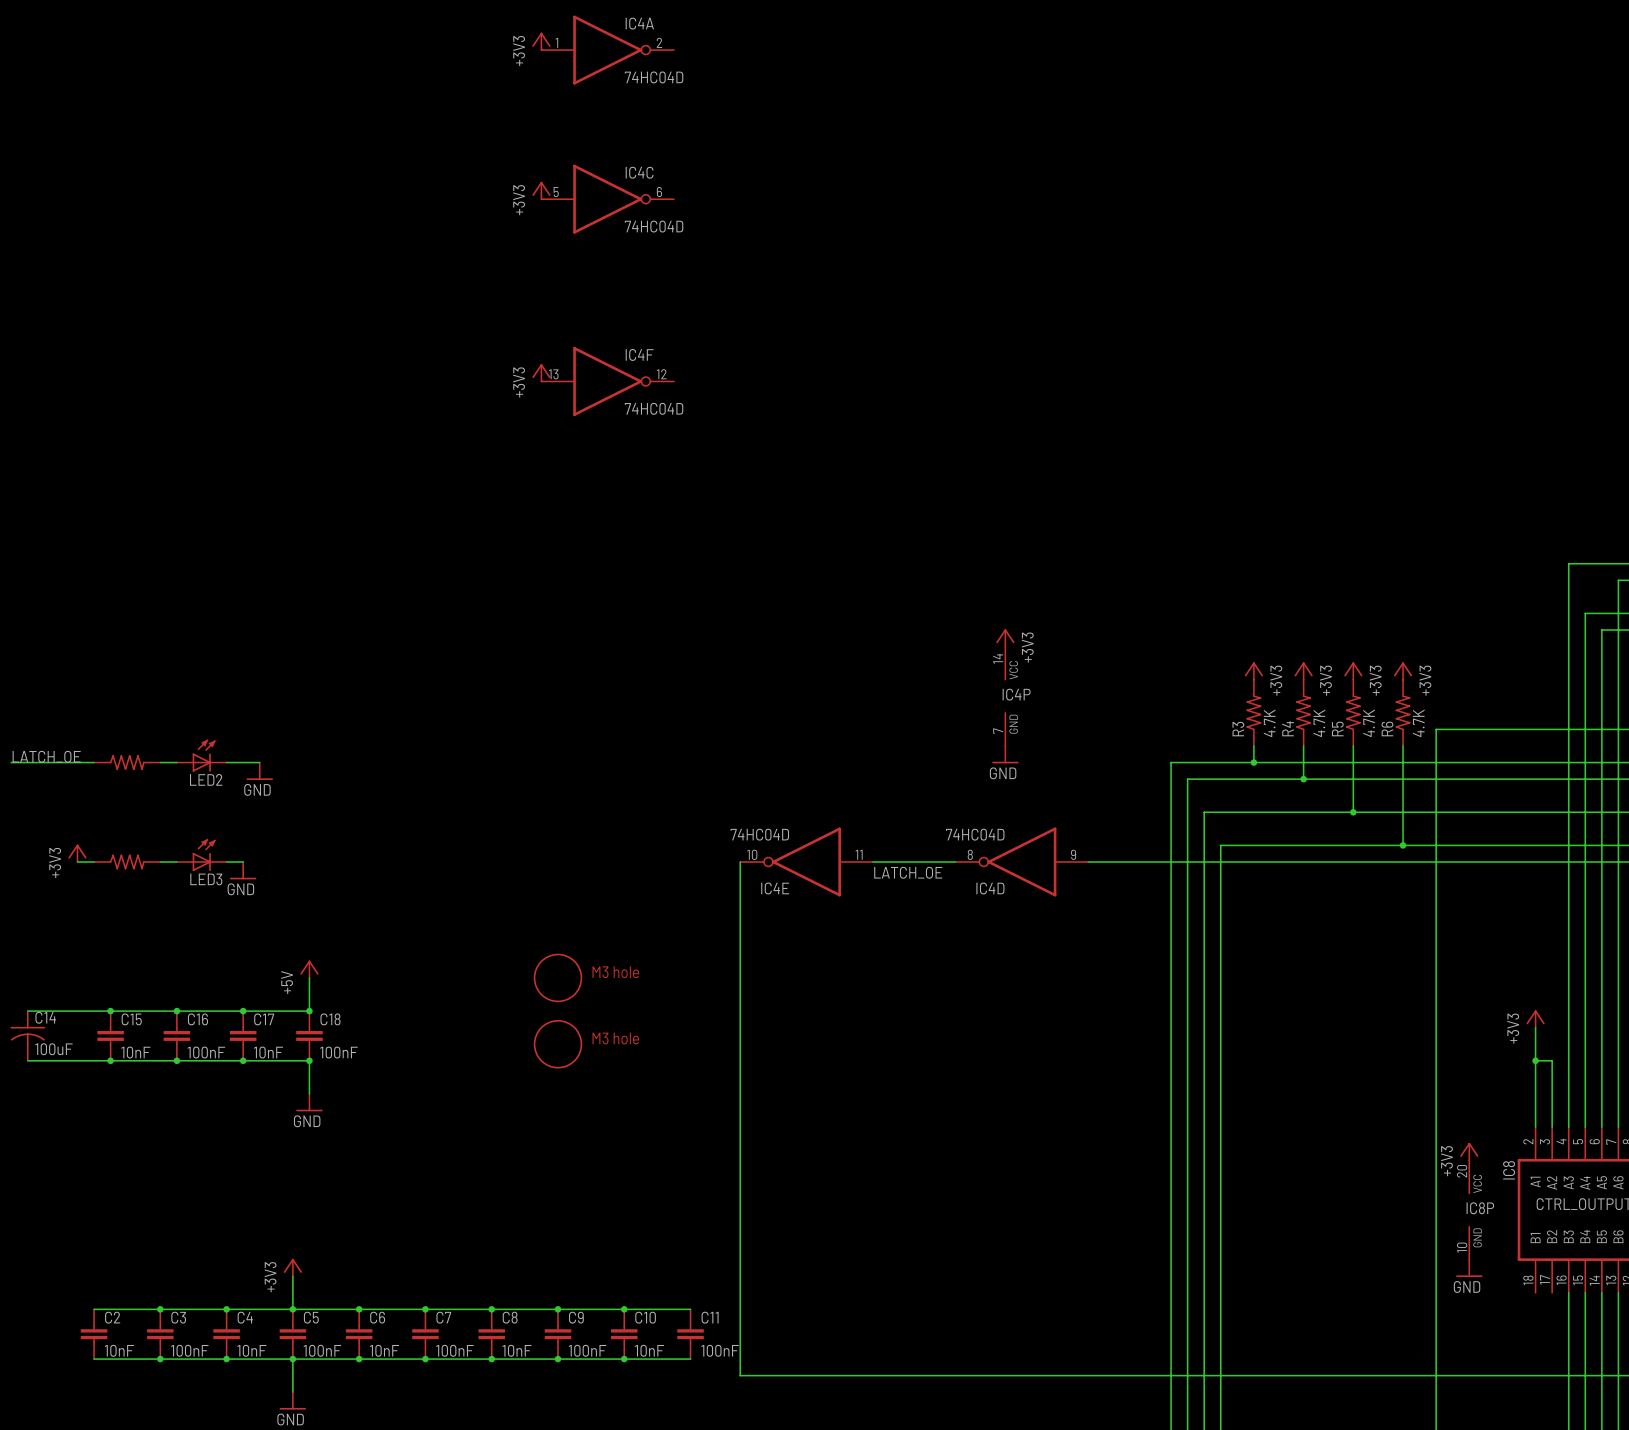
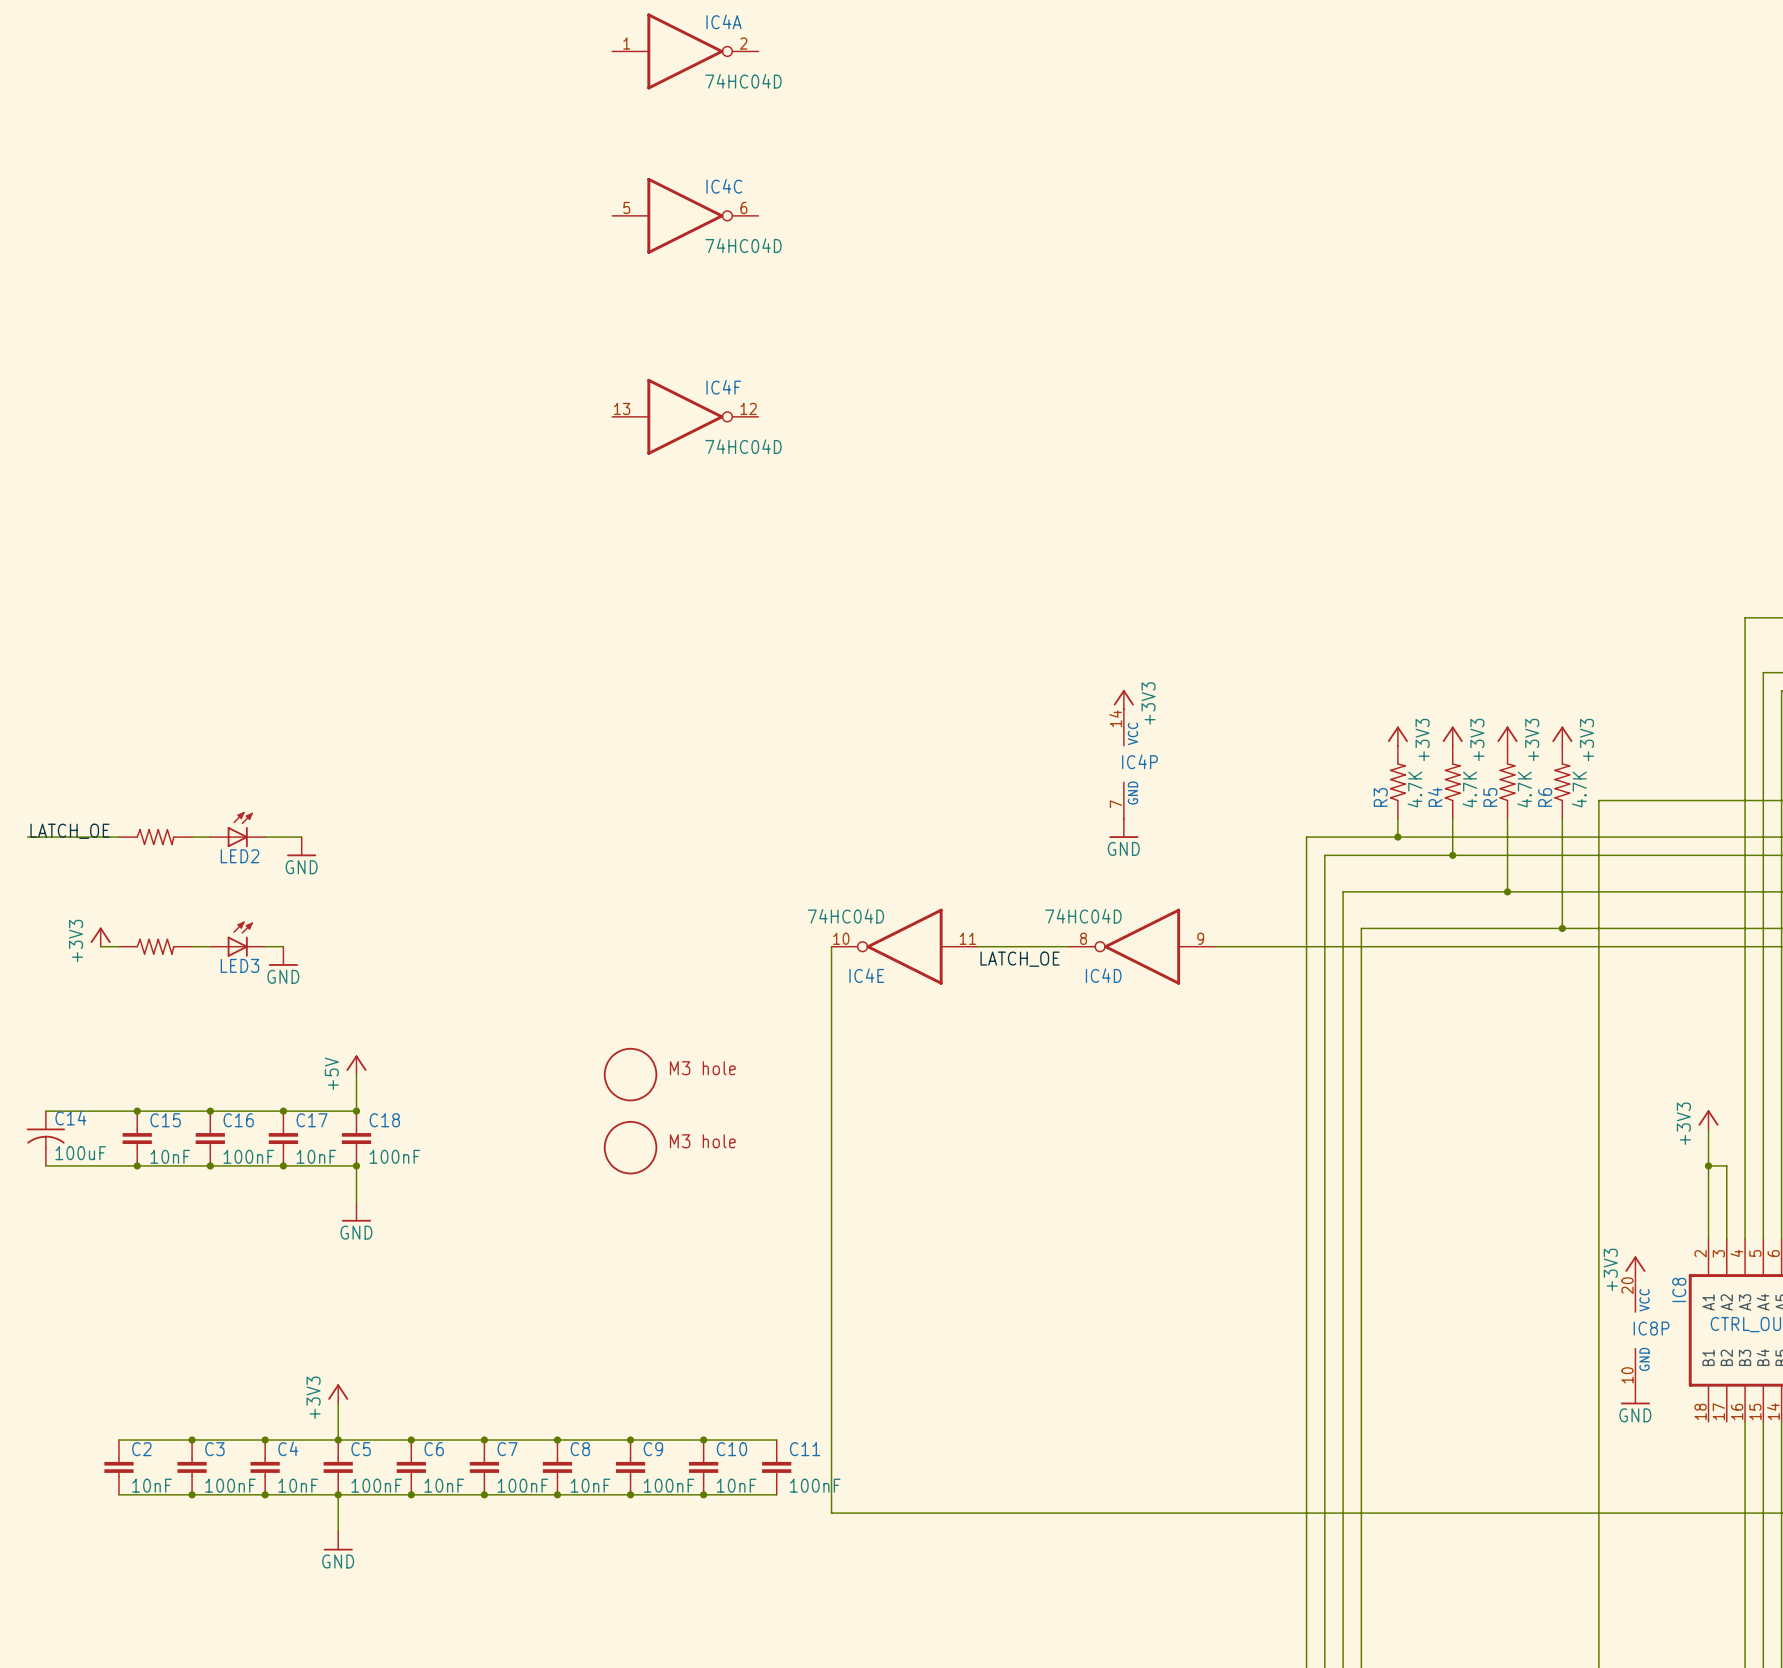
power symbol: +3V3 (541, 41) -> none
power symbol: +3V3 (541, 190) -> none
power symbol: +3V3 (541, 372) -> none

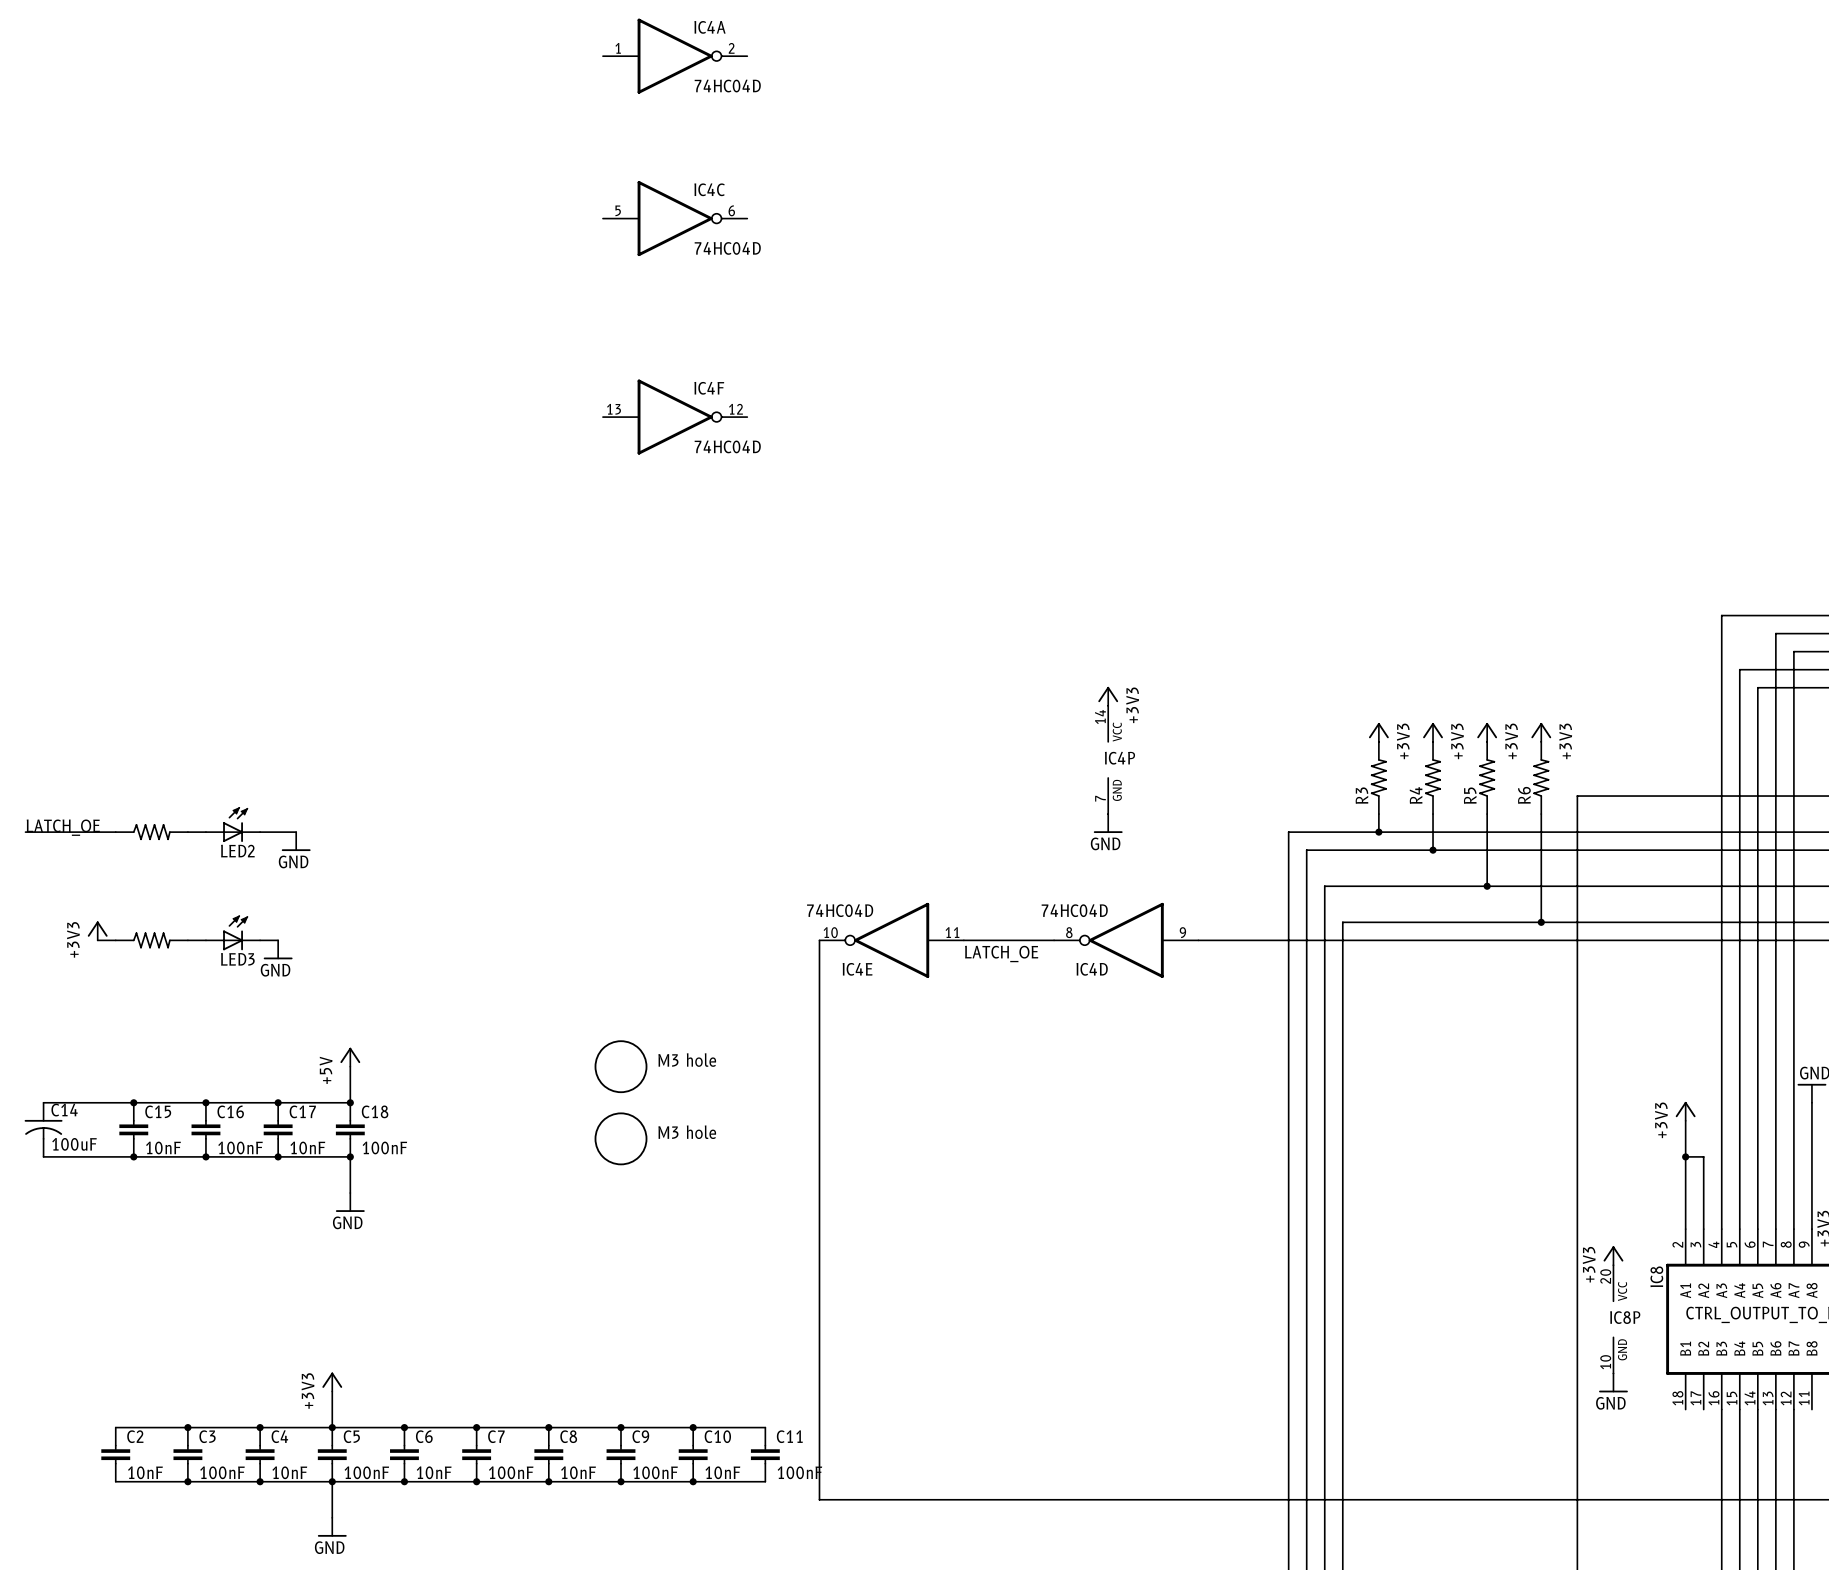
R3 value: 4.7K (1414, 789) -> none
R4 value: 4.7K (1469, 789) -> none
R5 value: 4.7K (1524, 789) -> none
R6 value: 4.7K (1579, 789) -> none

